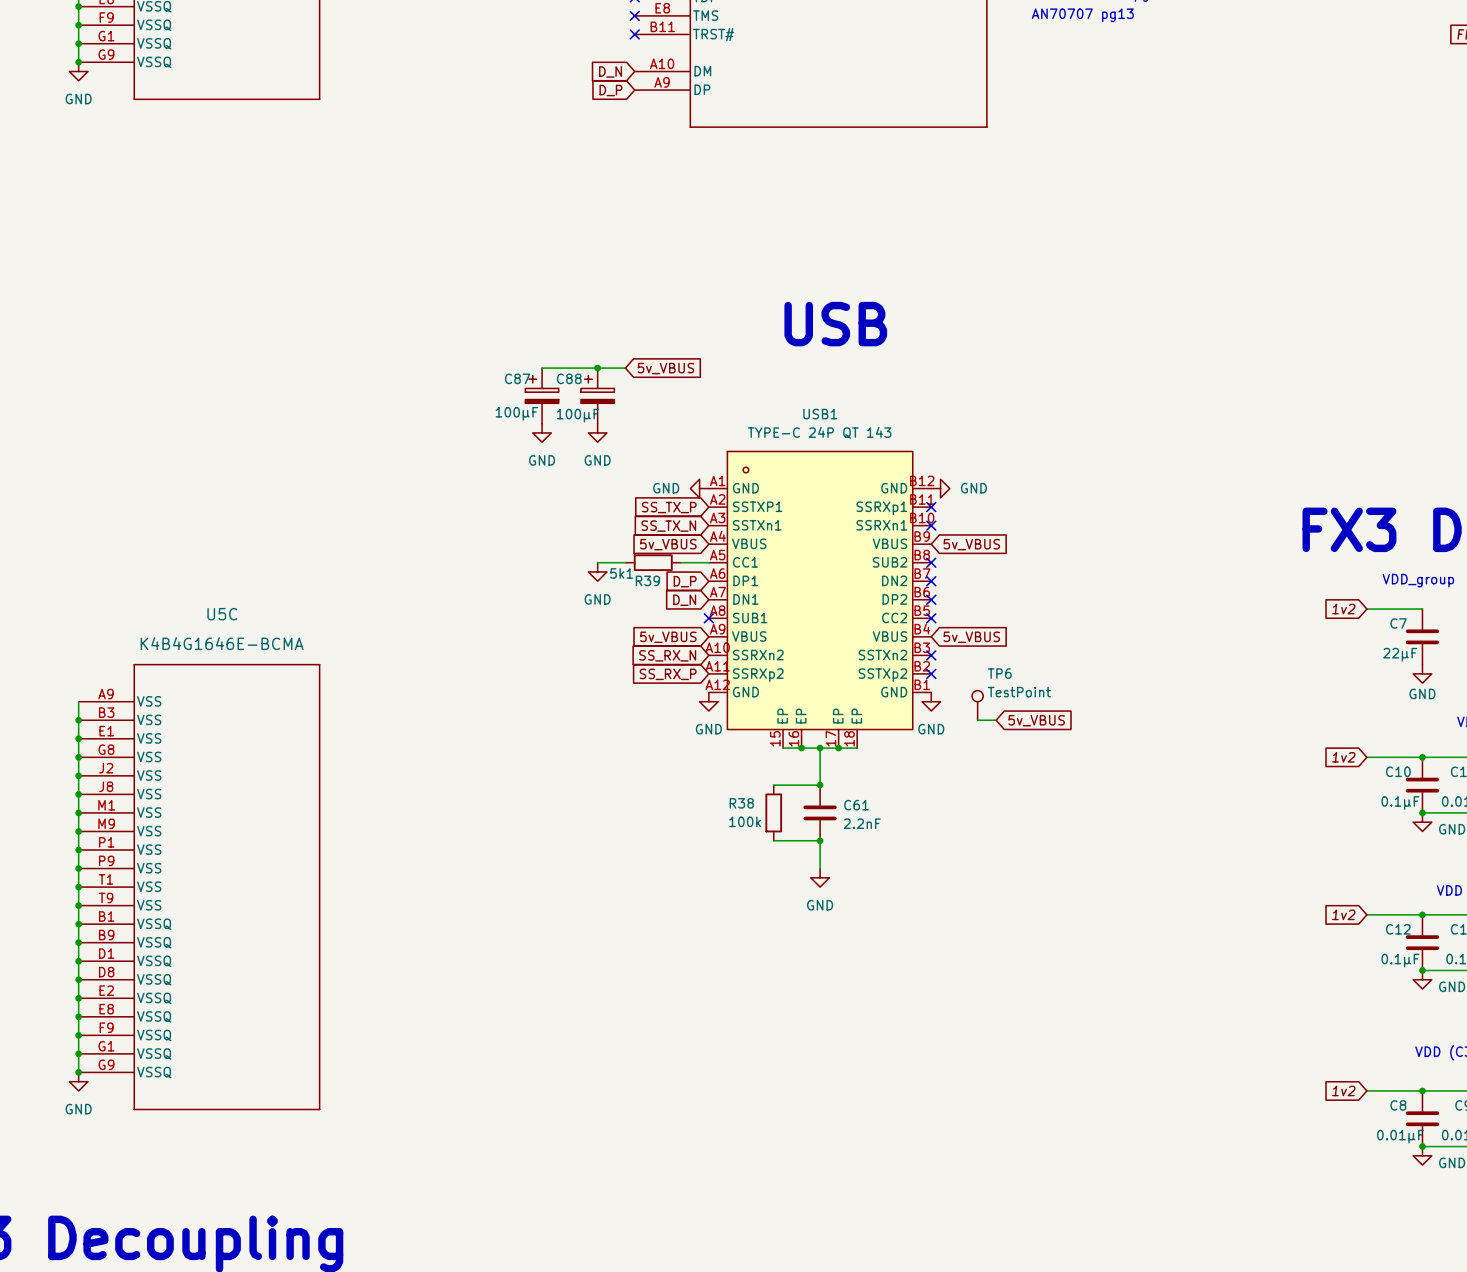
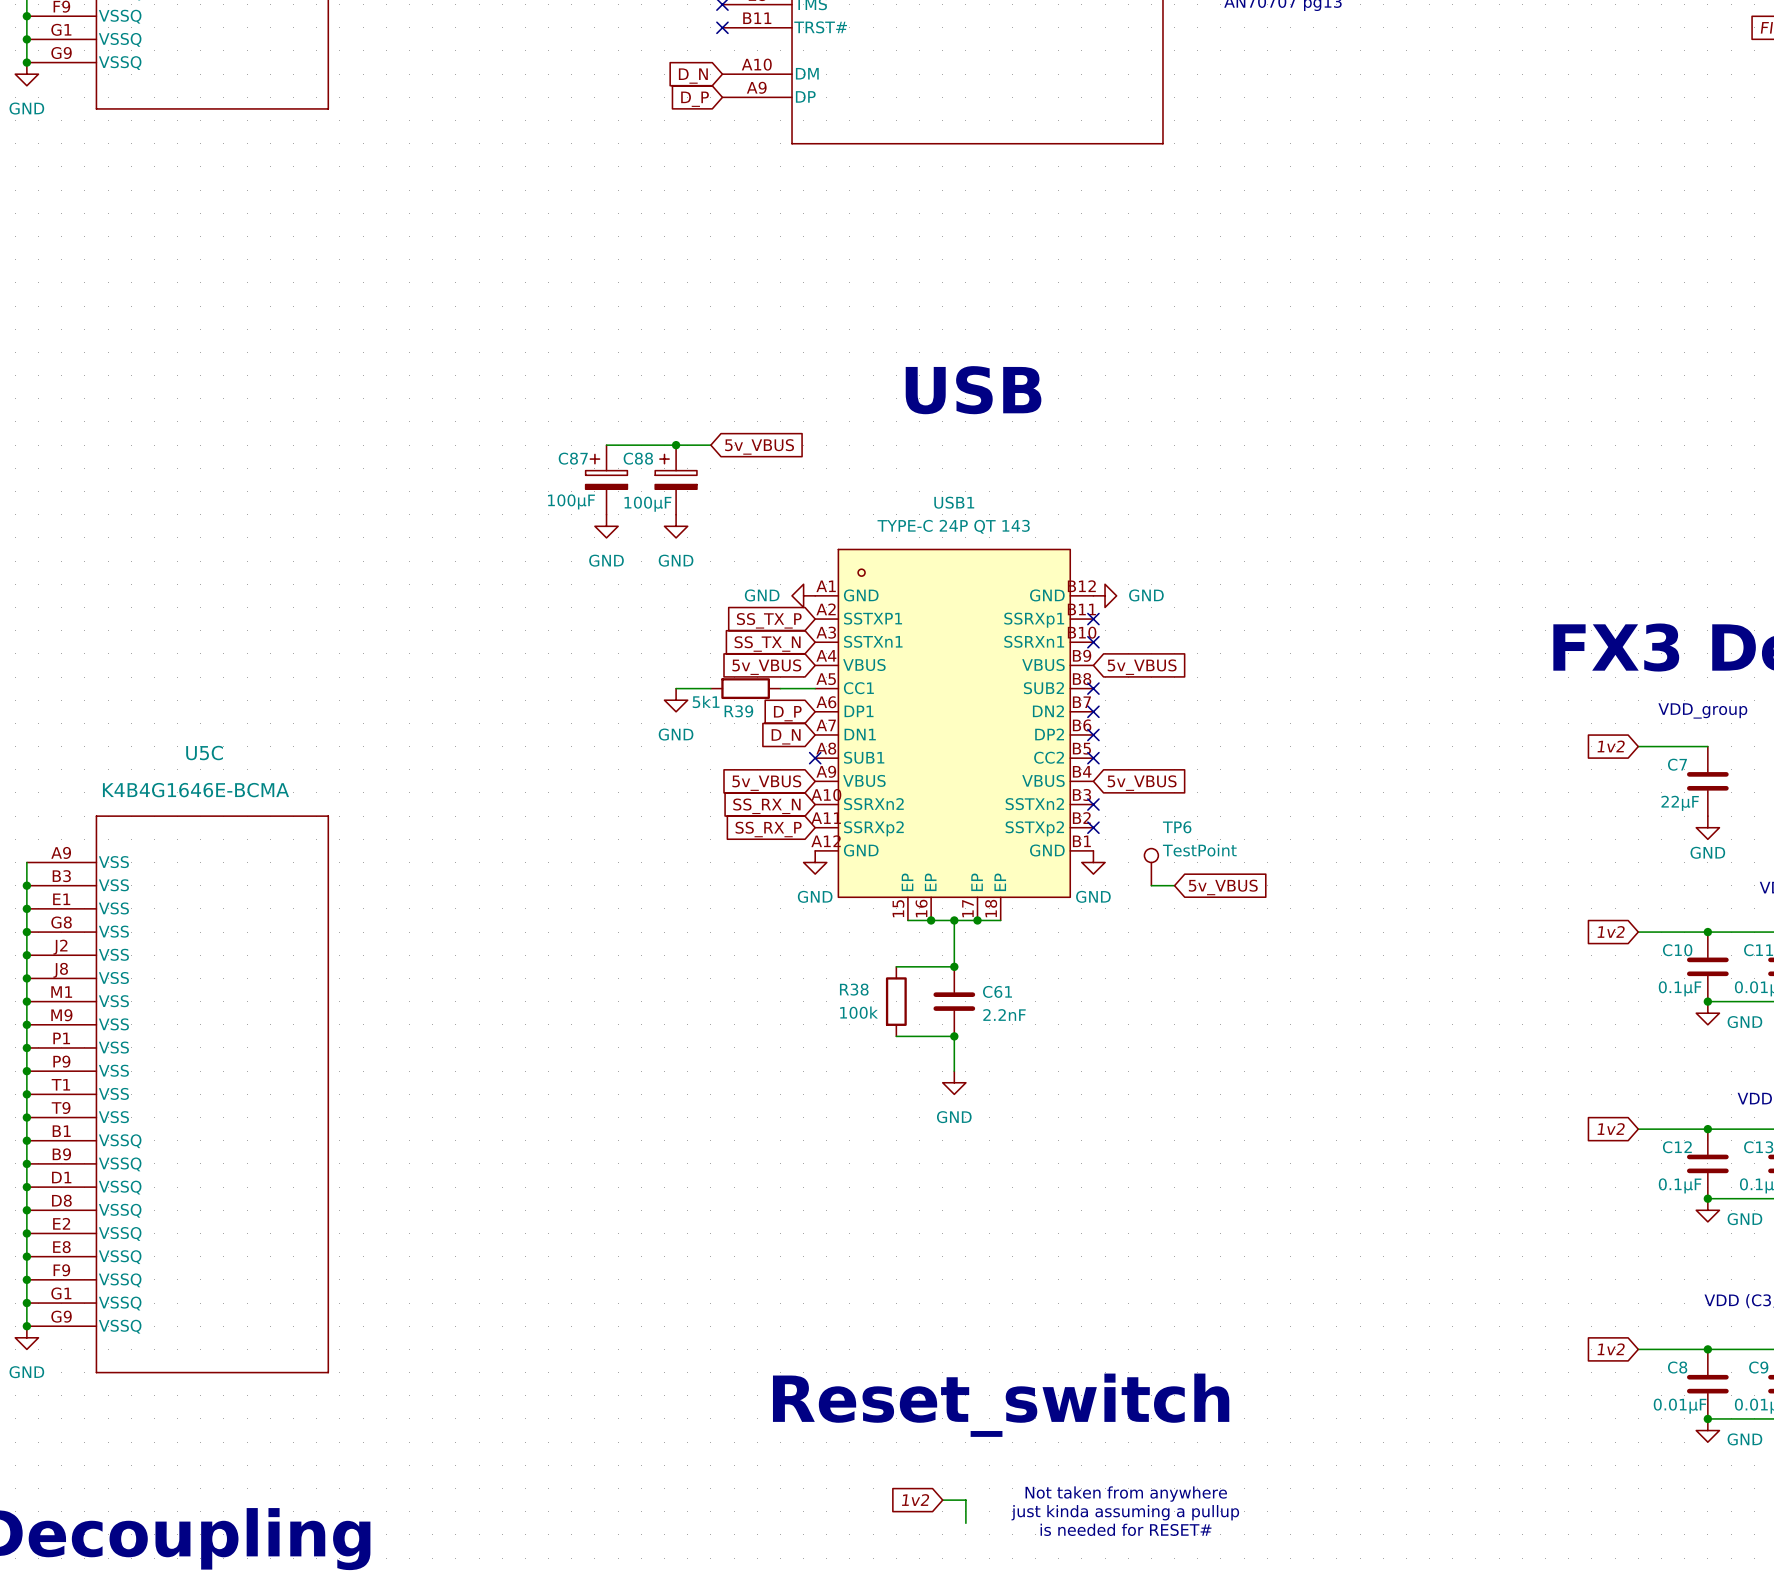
text: none -> Reset_switch (1001, 1405)
text: none -> Not taken from anywhere (1126, 1494)
global label: none -> 1v2 (915, 1500)
wire: none -> (942, 1500) (965, 1500) (965, 1523)
text: none -> just kinda assuming a pullup (1125, 1512)
text: none -> is needed for RESET# (1126, 1529)

